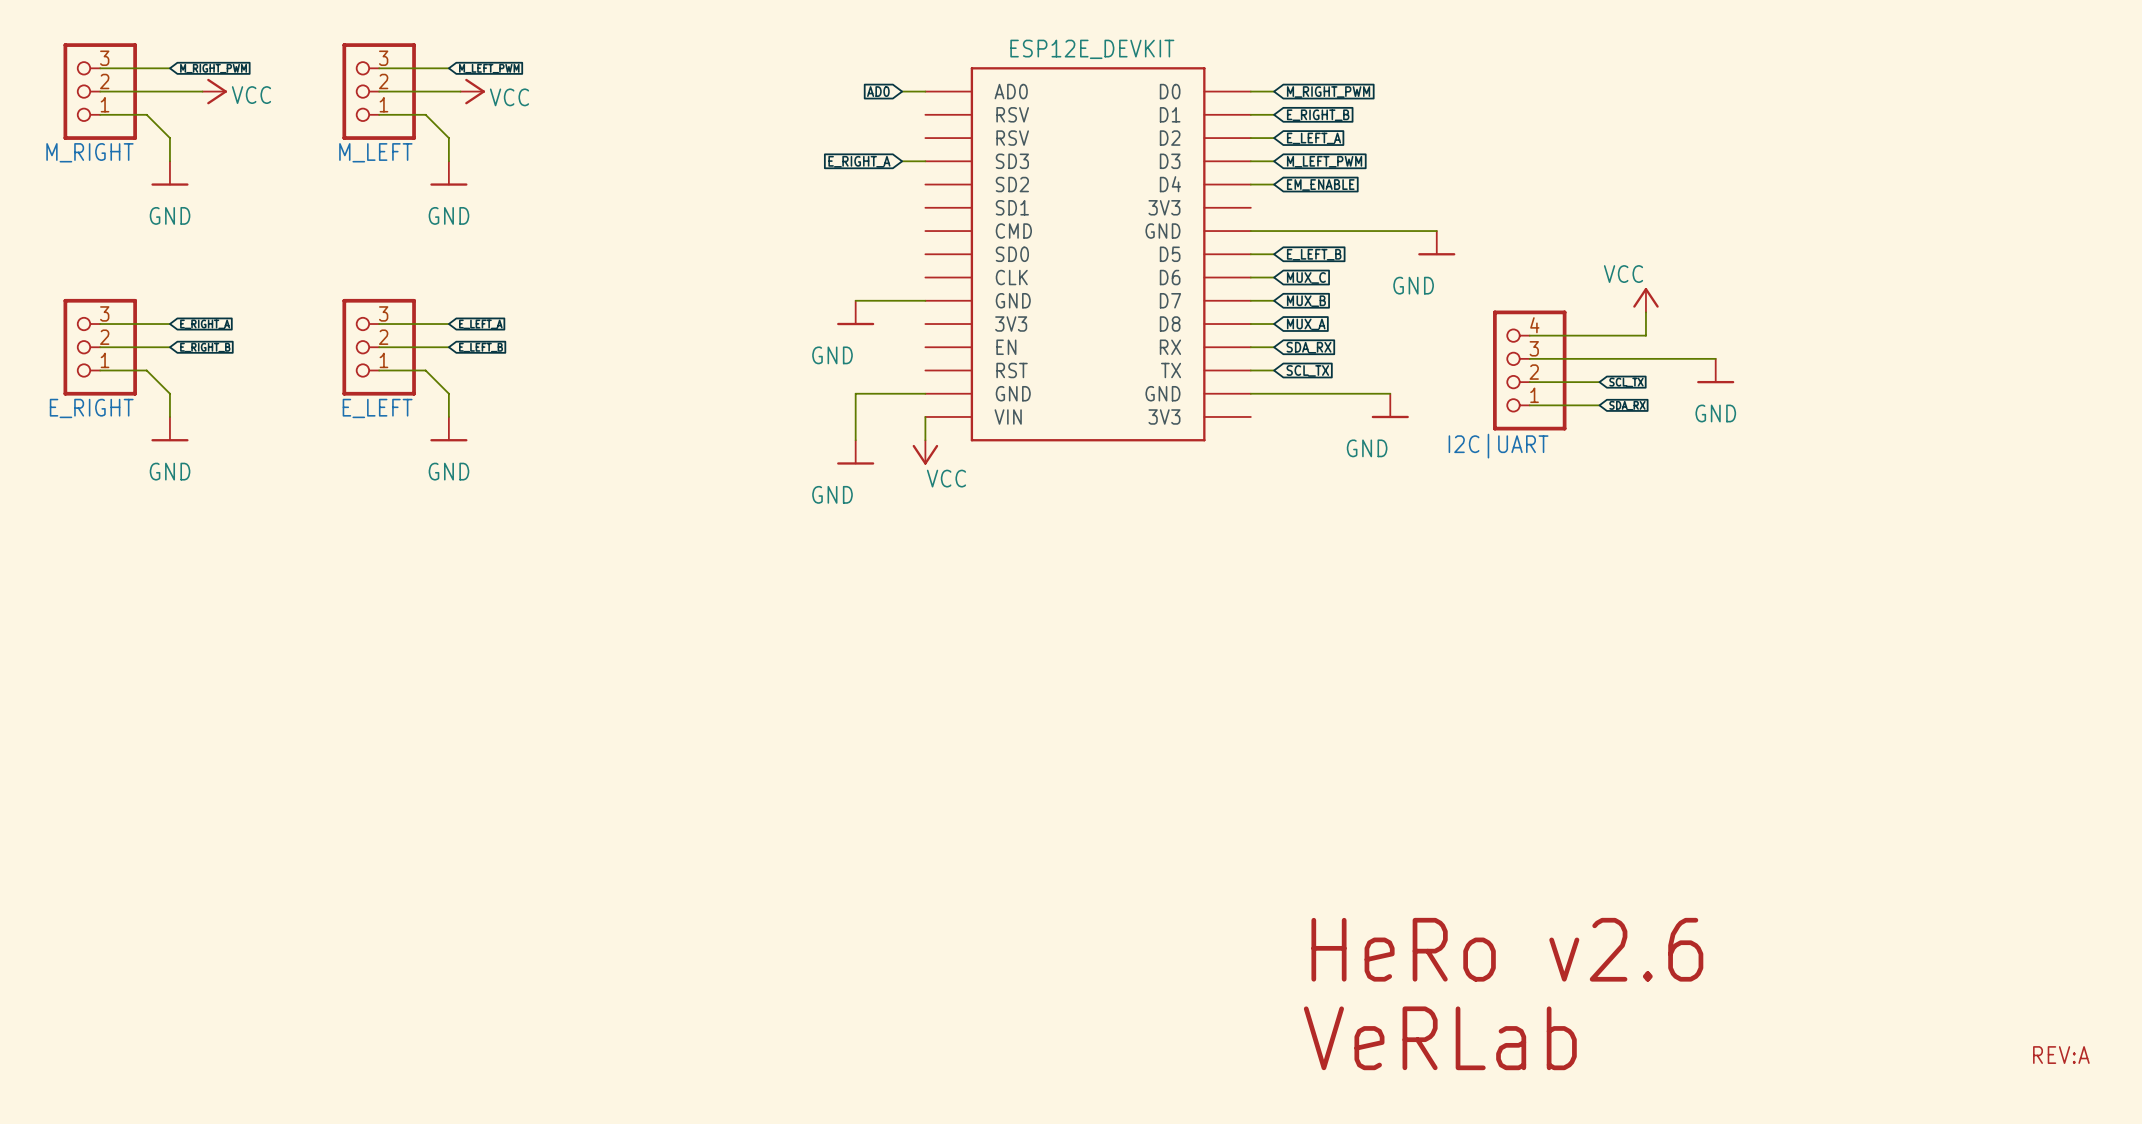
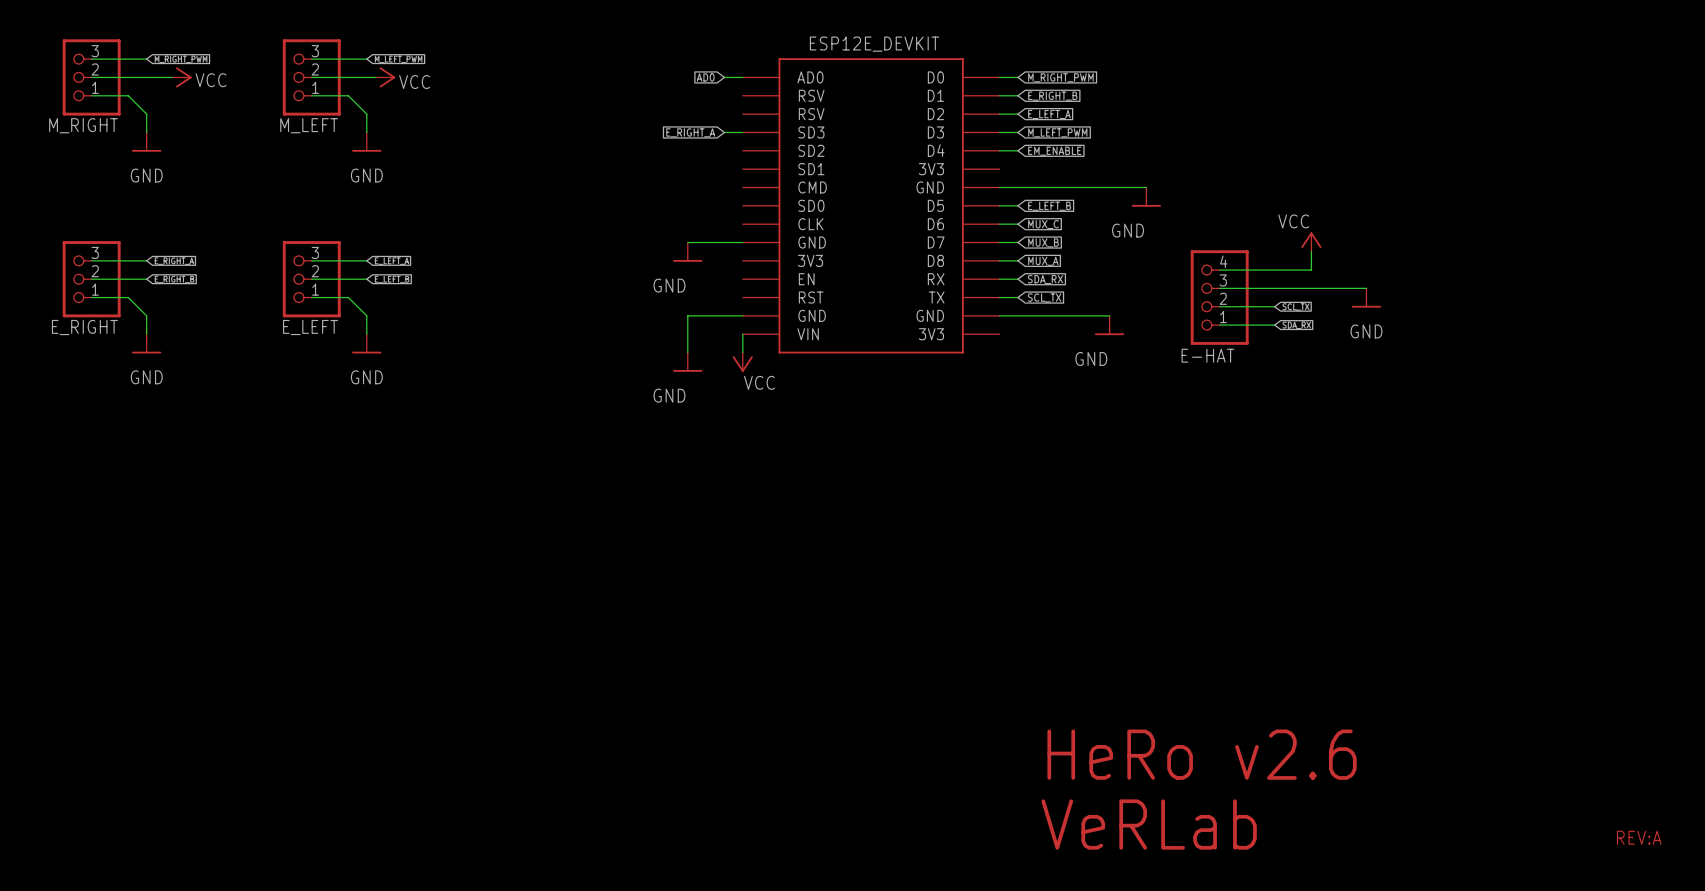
I2C|UART name: I2C|UART (1498, 446) -> E-HAT (1208, 355)

